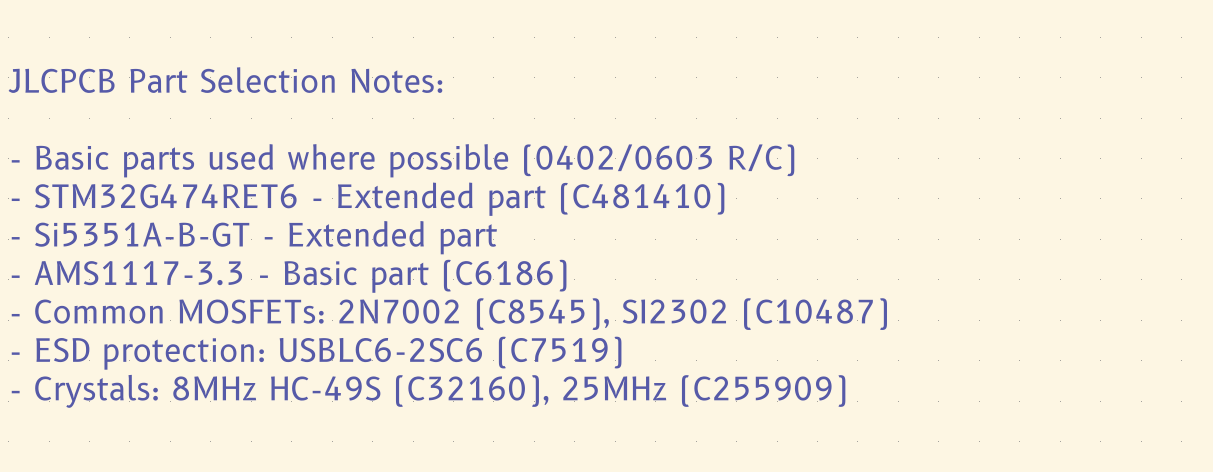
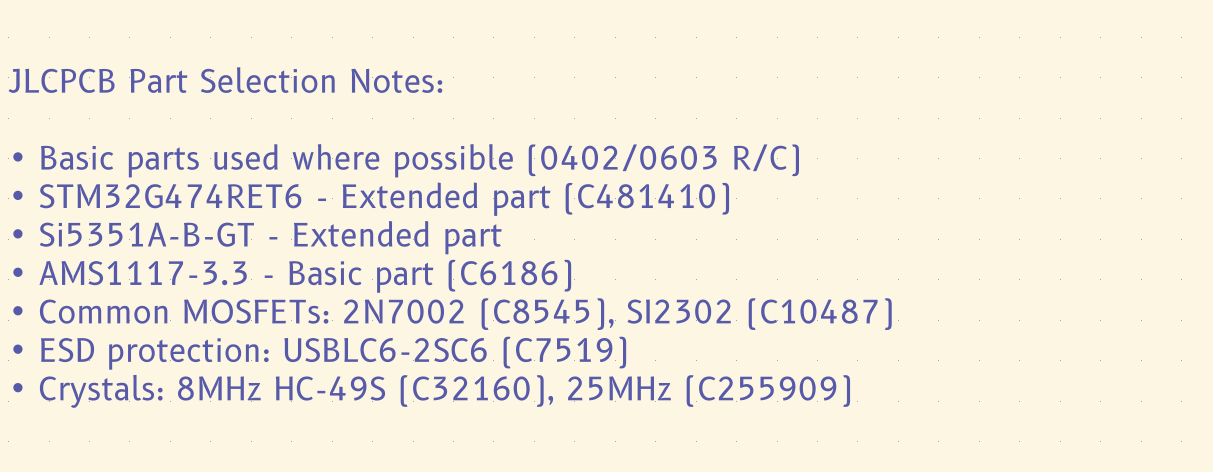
text: - Basic parts used where possible (0402/0603 R/C) (403, 160) -> • Basic parts used where possible (0402/0603 R/C) (406, 160)
text: - STM32G474RET6 - Extended part (C481410) (368, 199) -> • STM32G474RET6 - Extended part (C481410) (371, 199)
text: - Si5351A-B-GT - Extended part (254, 237) -> • Si5351A-B-GT - Extended part (257, 237)
text: - AMS1117-3.3 - Basic part (C6186) (289, 276) -> • AMS1117-3.3 - Basic part (C6186) (292, 276)
text: - Common MOSFETs: 2N7002 (C8545), SI2302 (C10487) (449, 314) -> • Common MOSFETs: 2N7002 (C8545), SI2302 (C10487) (452, 314)
text: - ESD protection: USBLC6-2SC6 (C7519) (316, 353) -> • ESD protection: USBLC6-2SC6 (C7519) (319, 353)
text: - Crystals: 8MHz HC-49S (C32160), 25MHz (C255909) (428, 391) -> • Crystals: 8MHz HC-49S (C32160), 25MHz (C255909) (431, 391)

